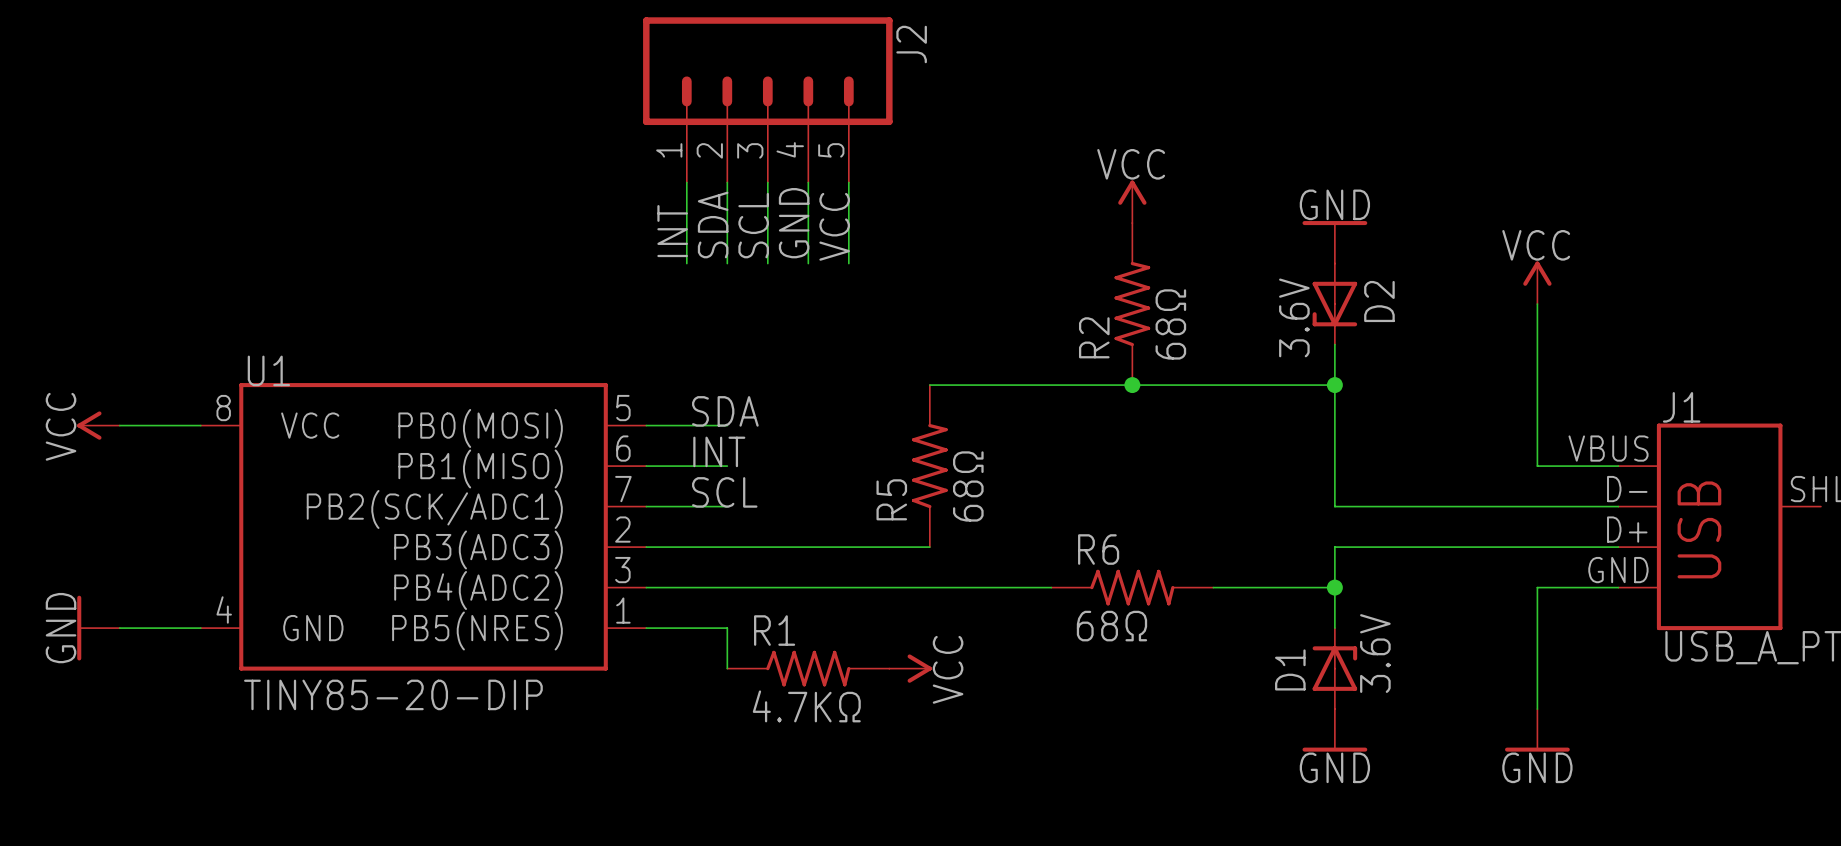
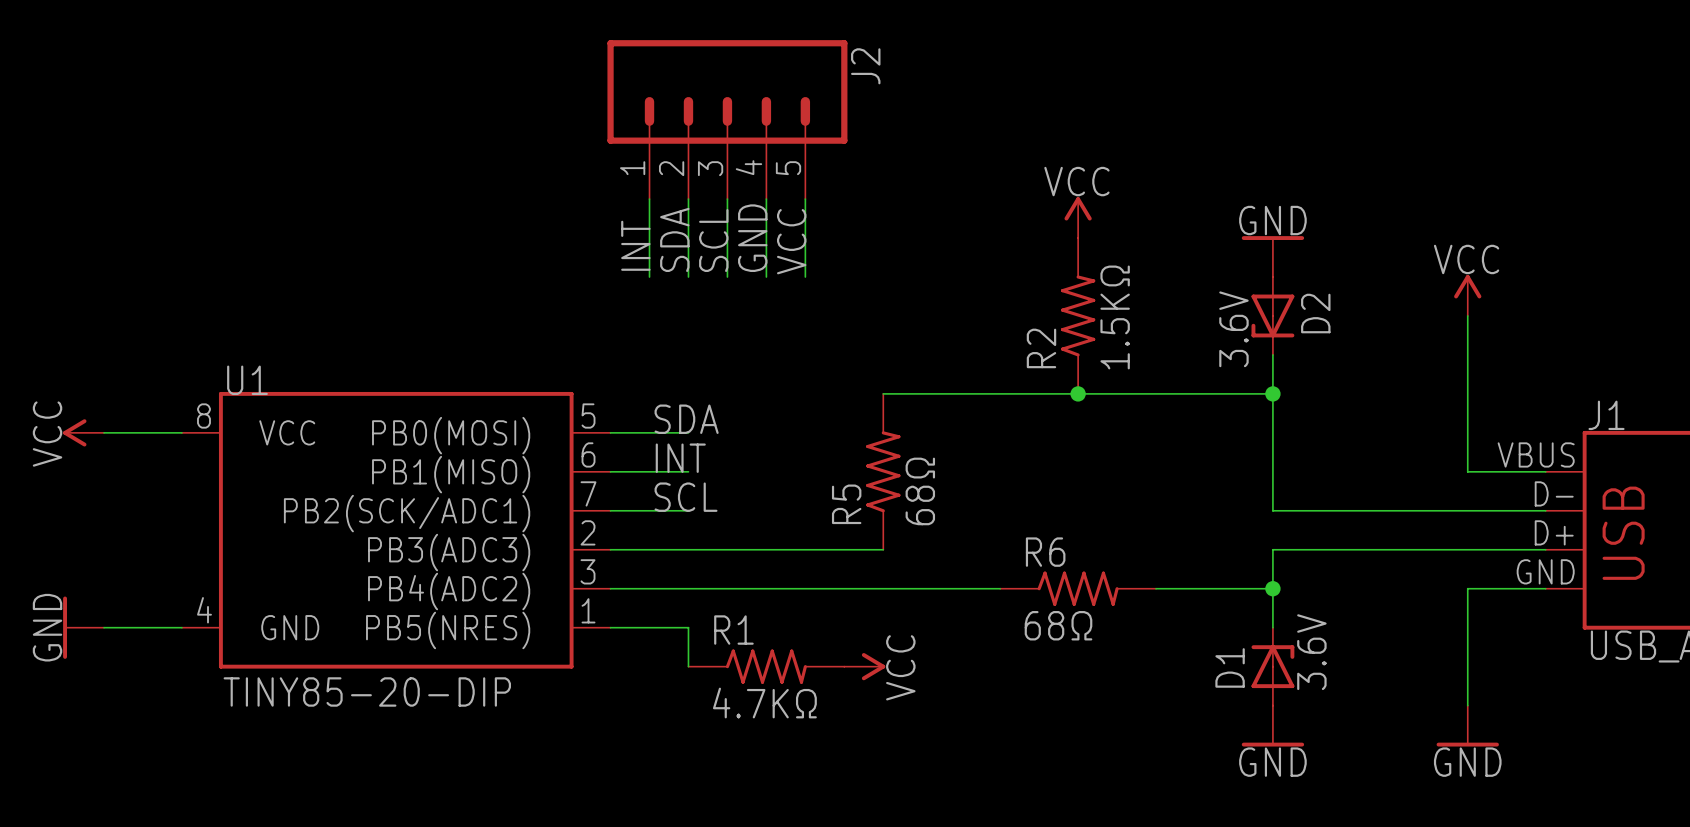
R2 value: 68Ω (1170, 324) -> 1.5KΩ (1115, 317)

